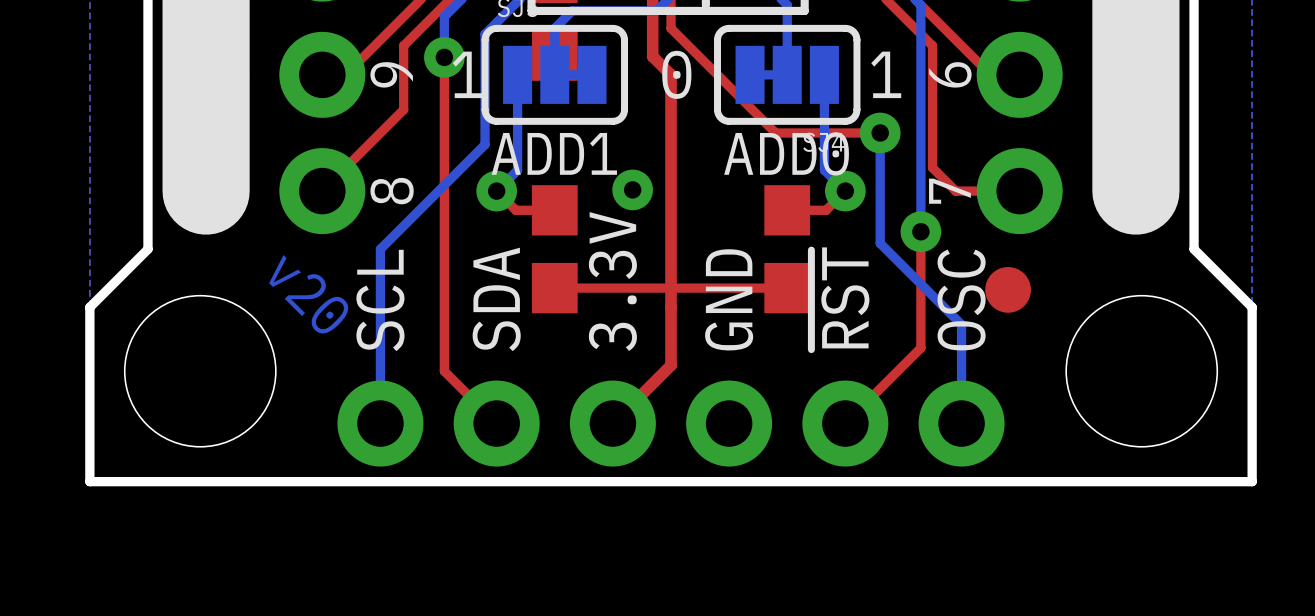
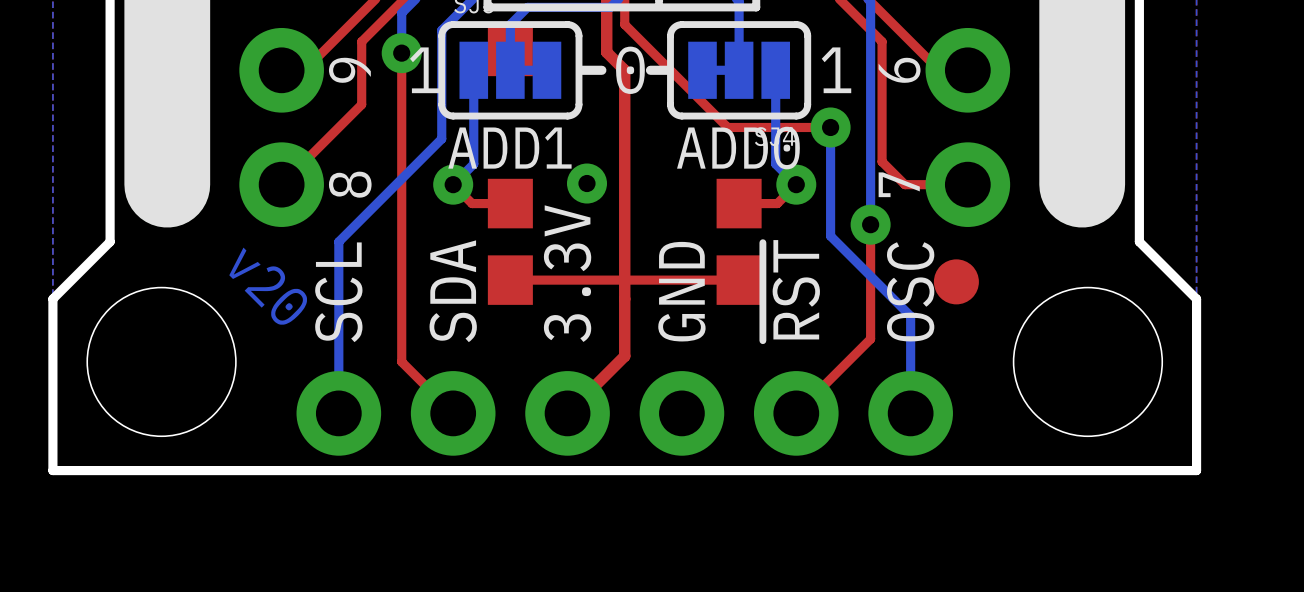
line: none -> (601, 70) (581, 70)
line: none -> (667, 70) (650, 70)

